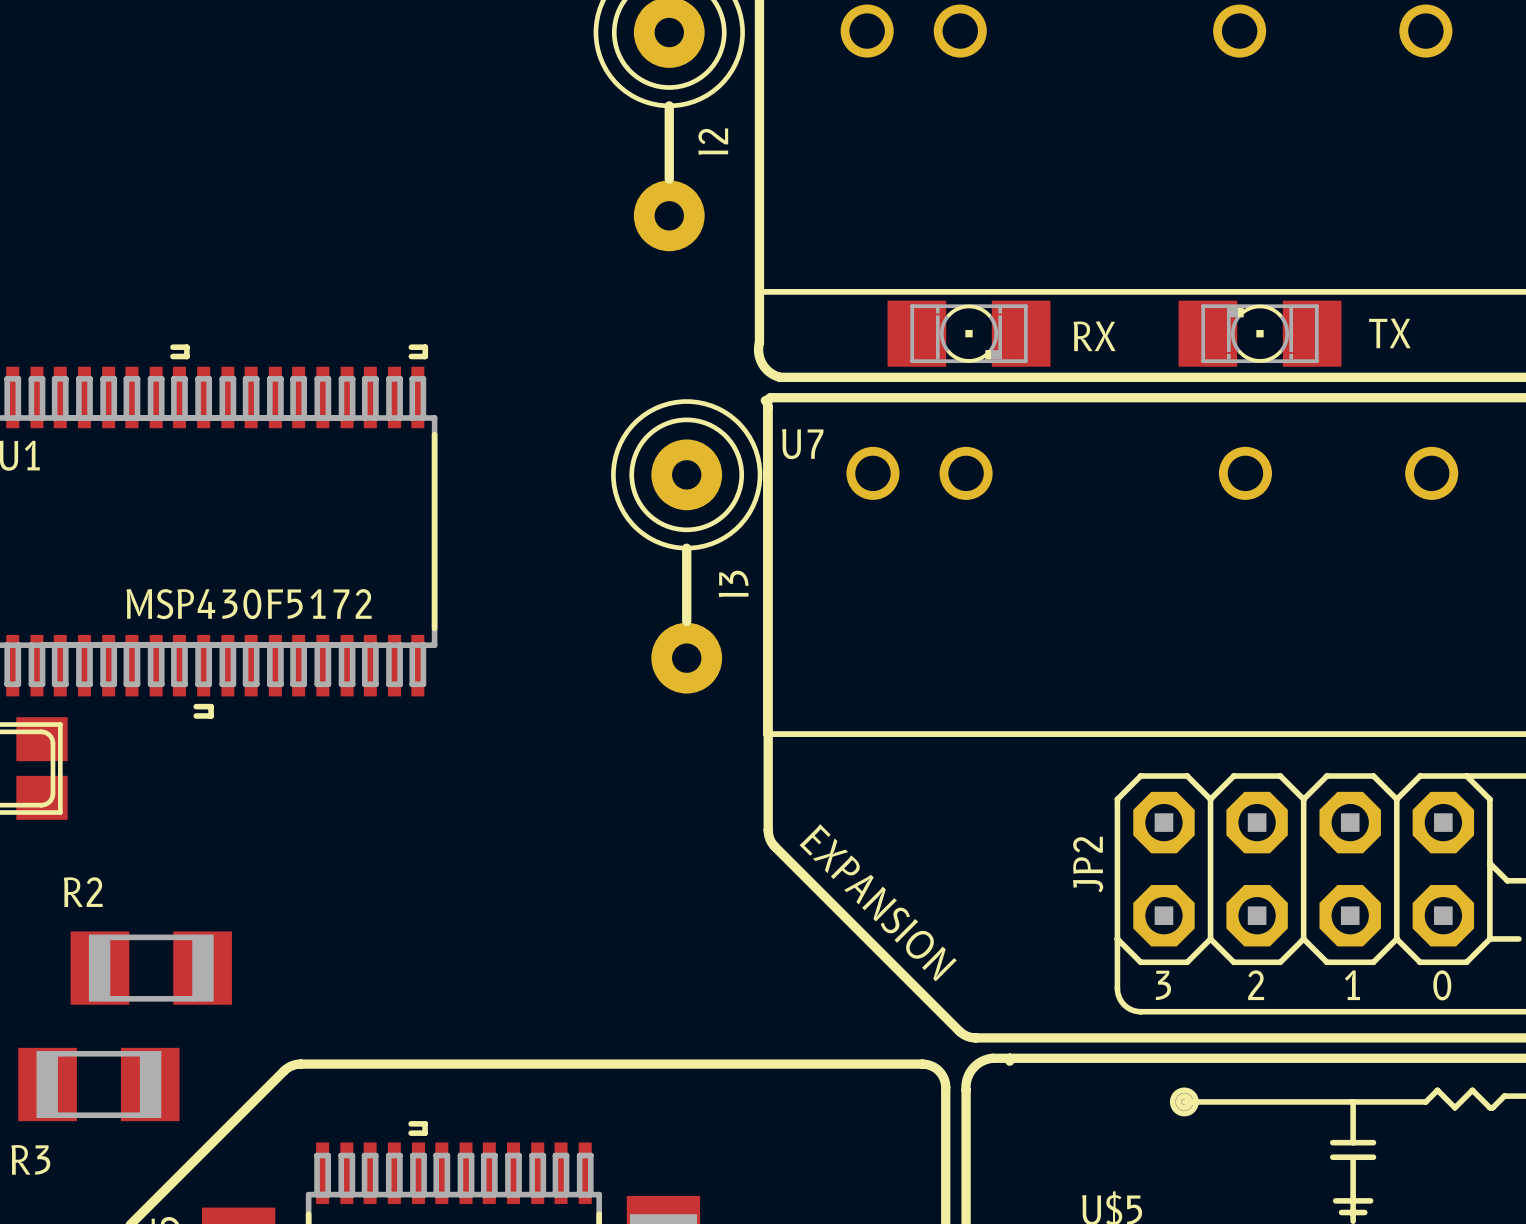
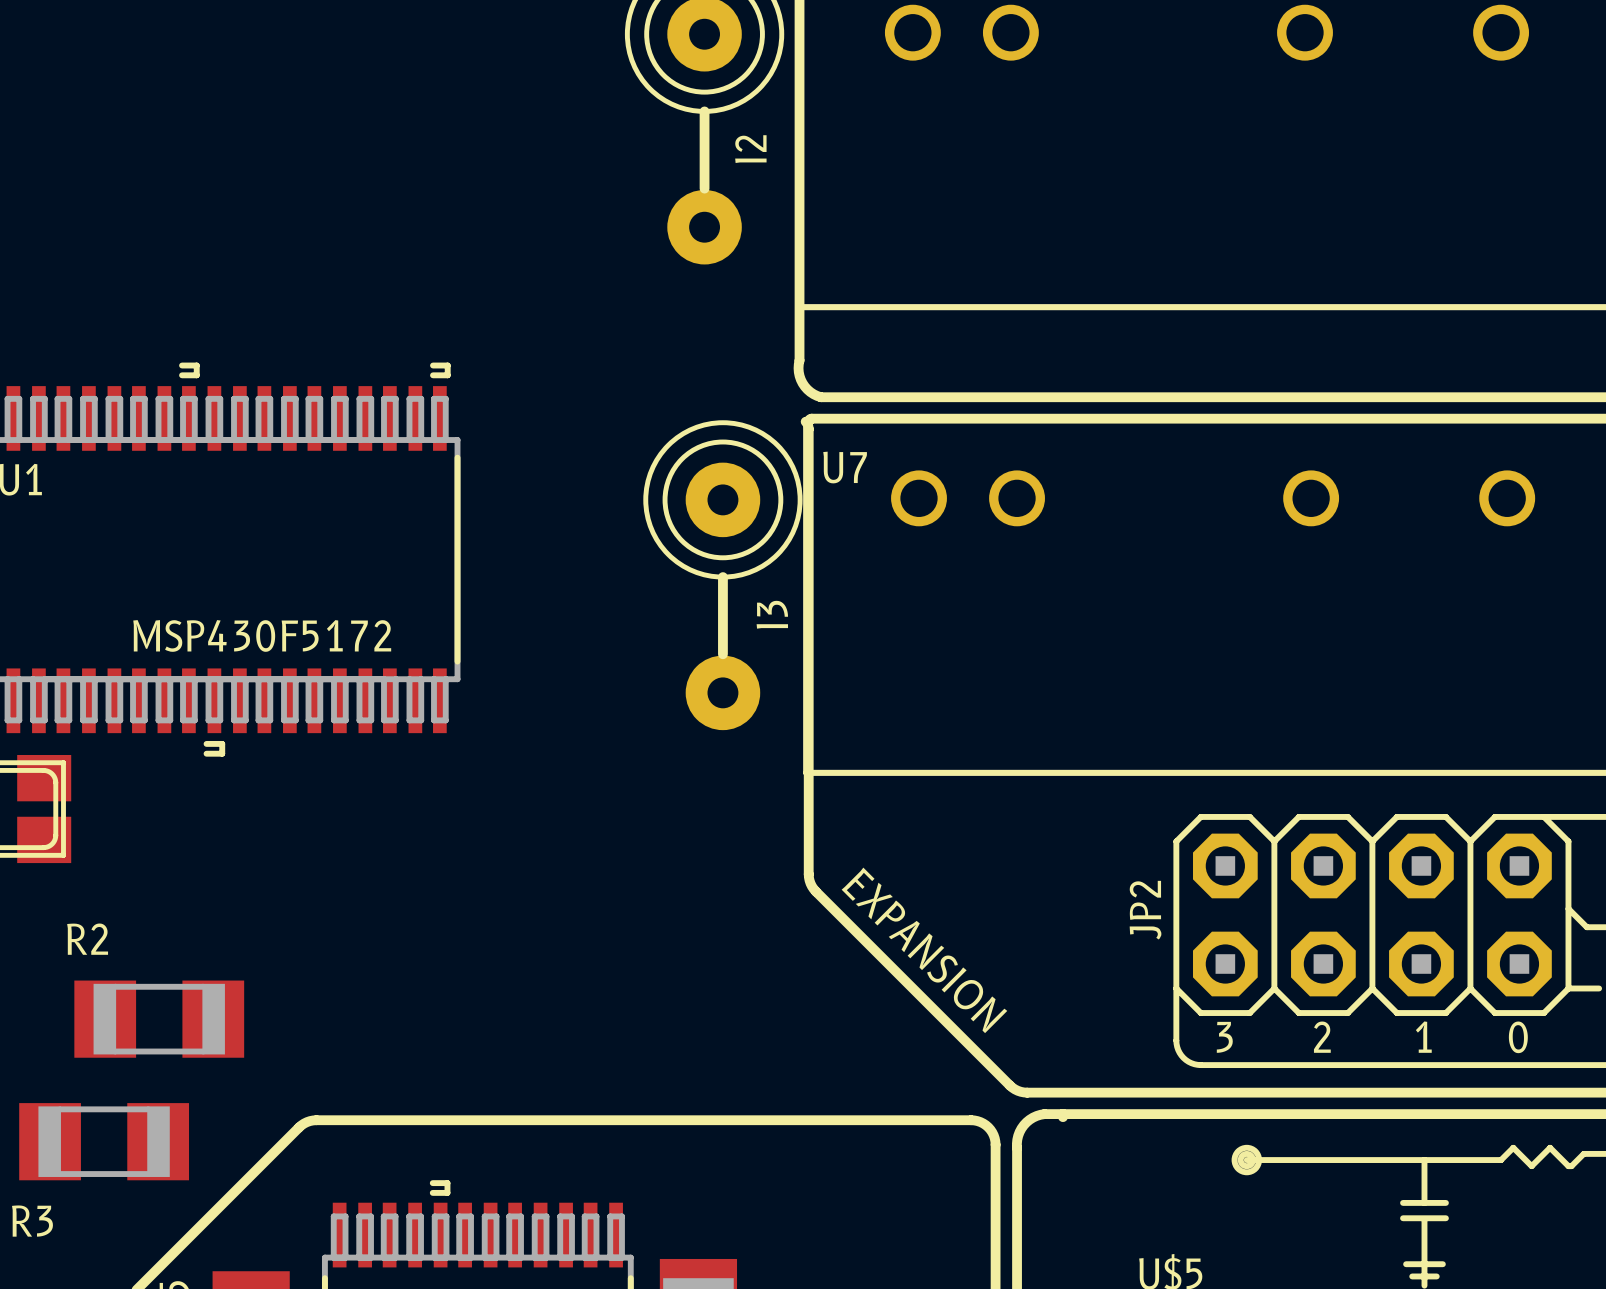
part: (969, 333) -> none
part: (1260, 333) -> none
text: TX (1389, 333) -> none
text: RX (1094, 336) -> none

